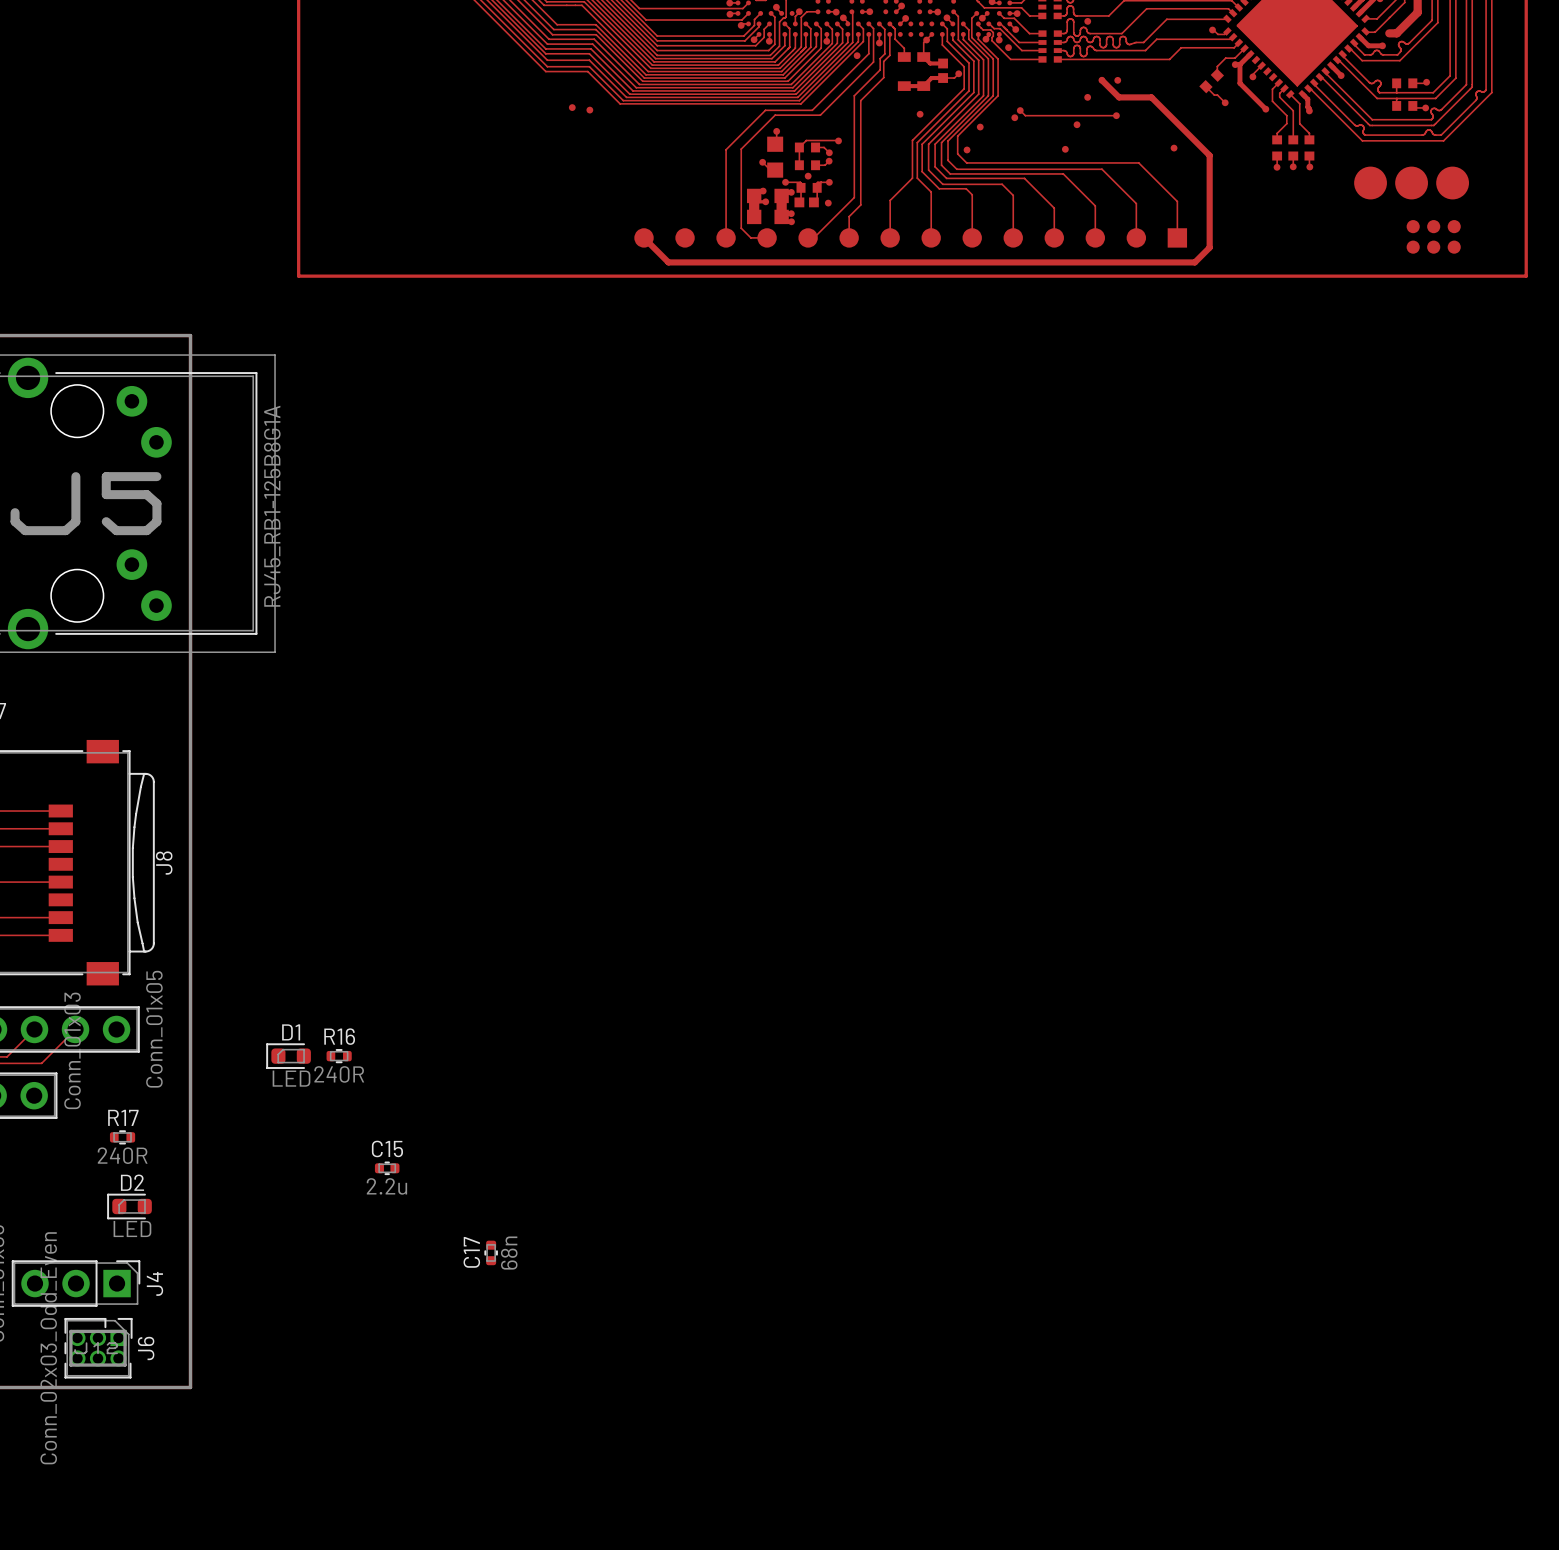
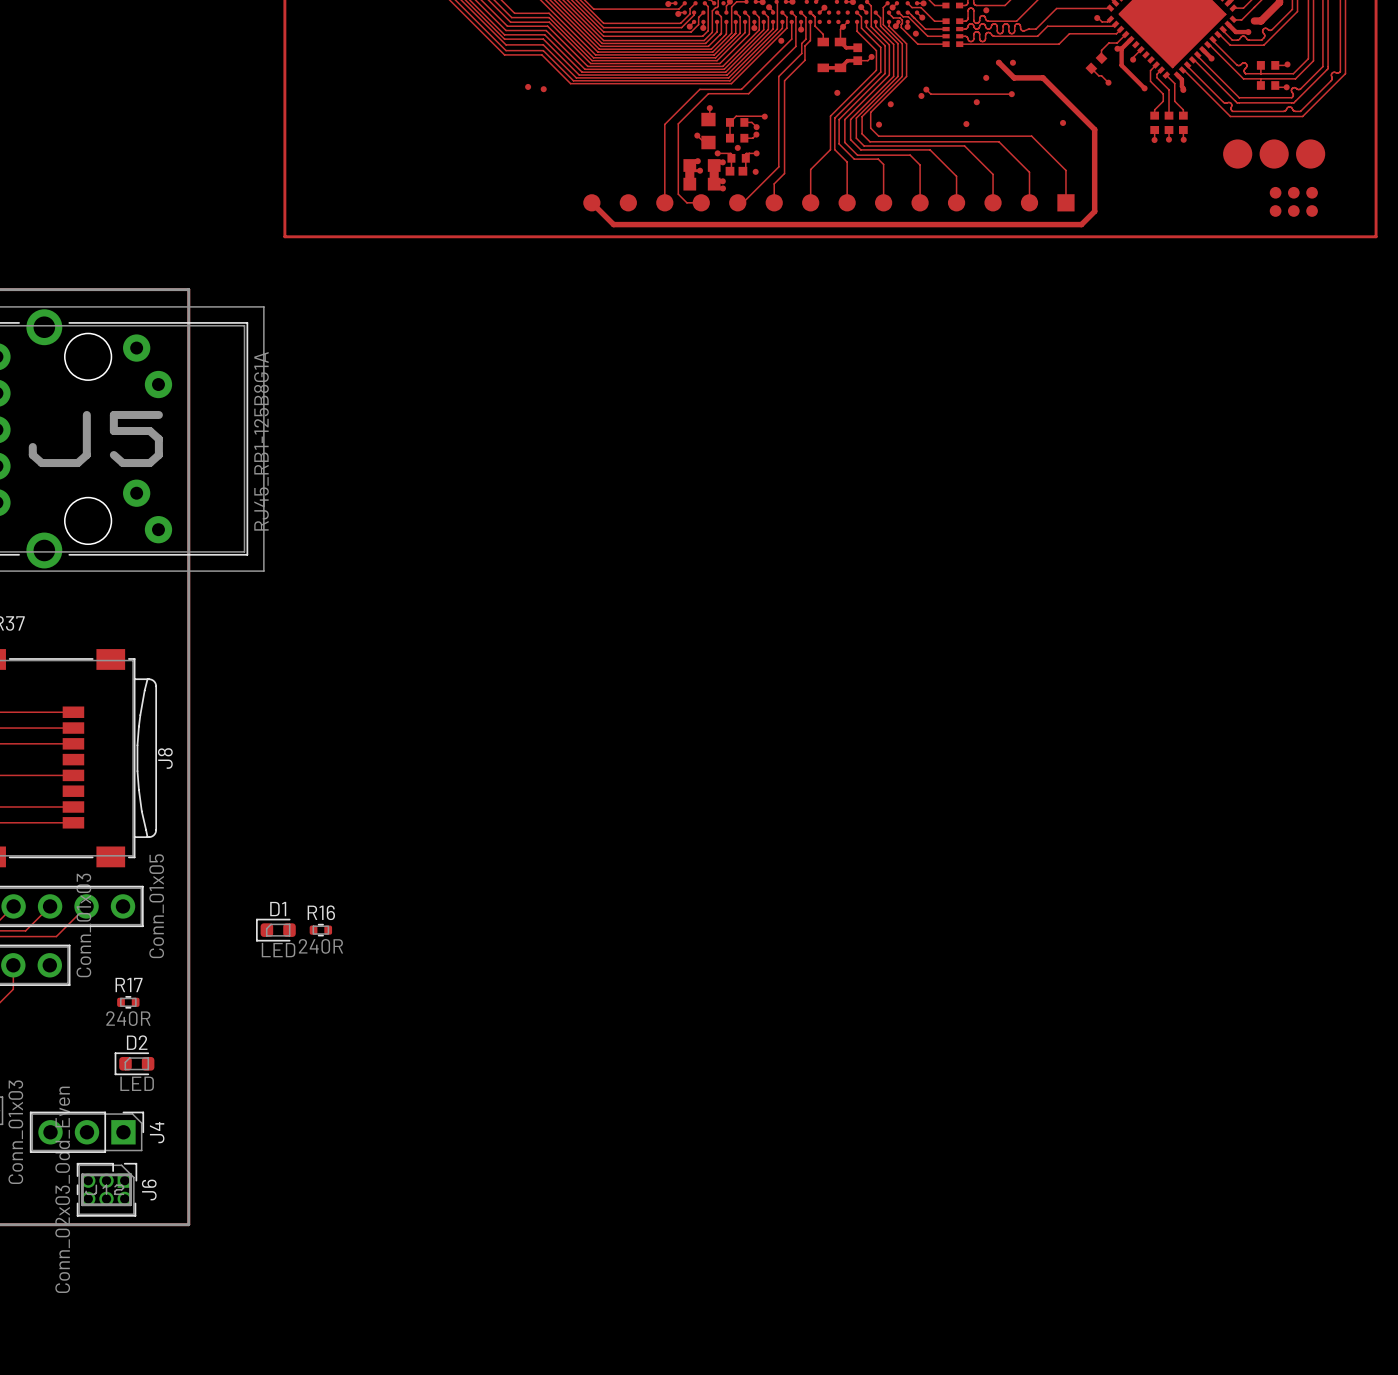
C15: 2.2u (387, 1168) -> none
C17: 68n (491, 1252) -> none

